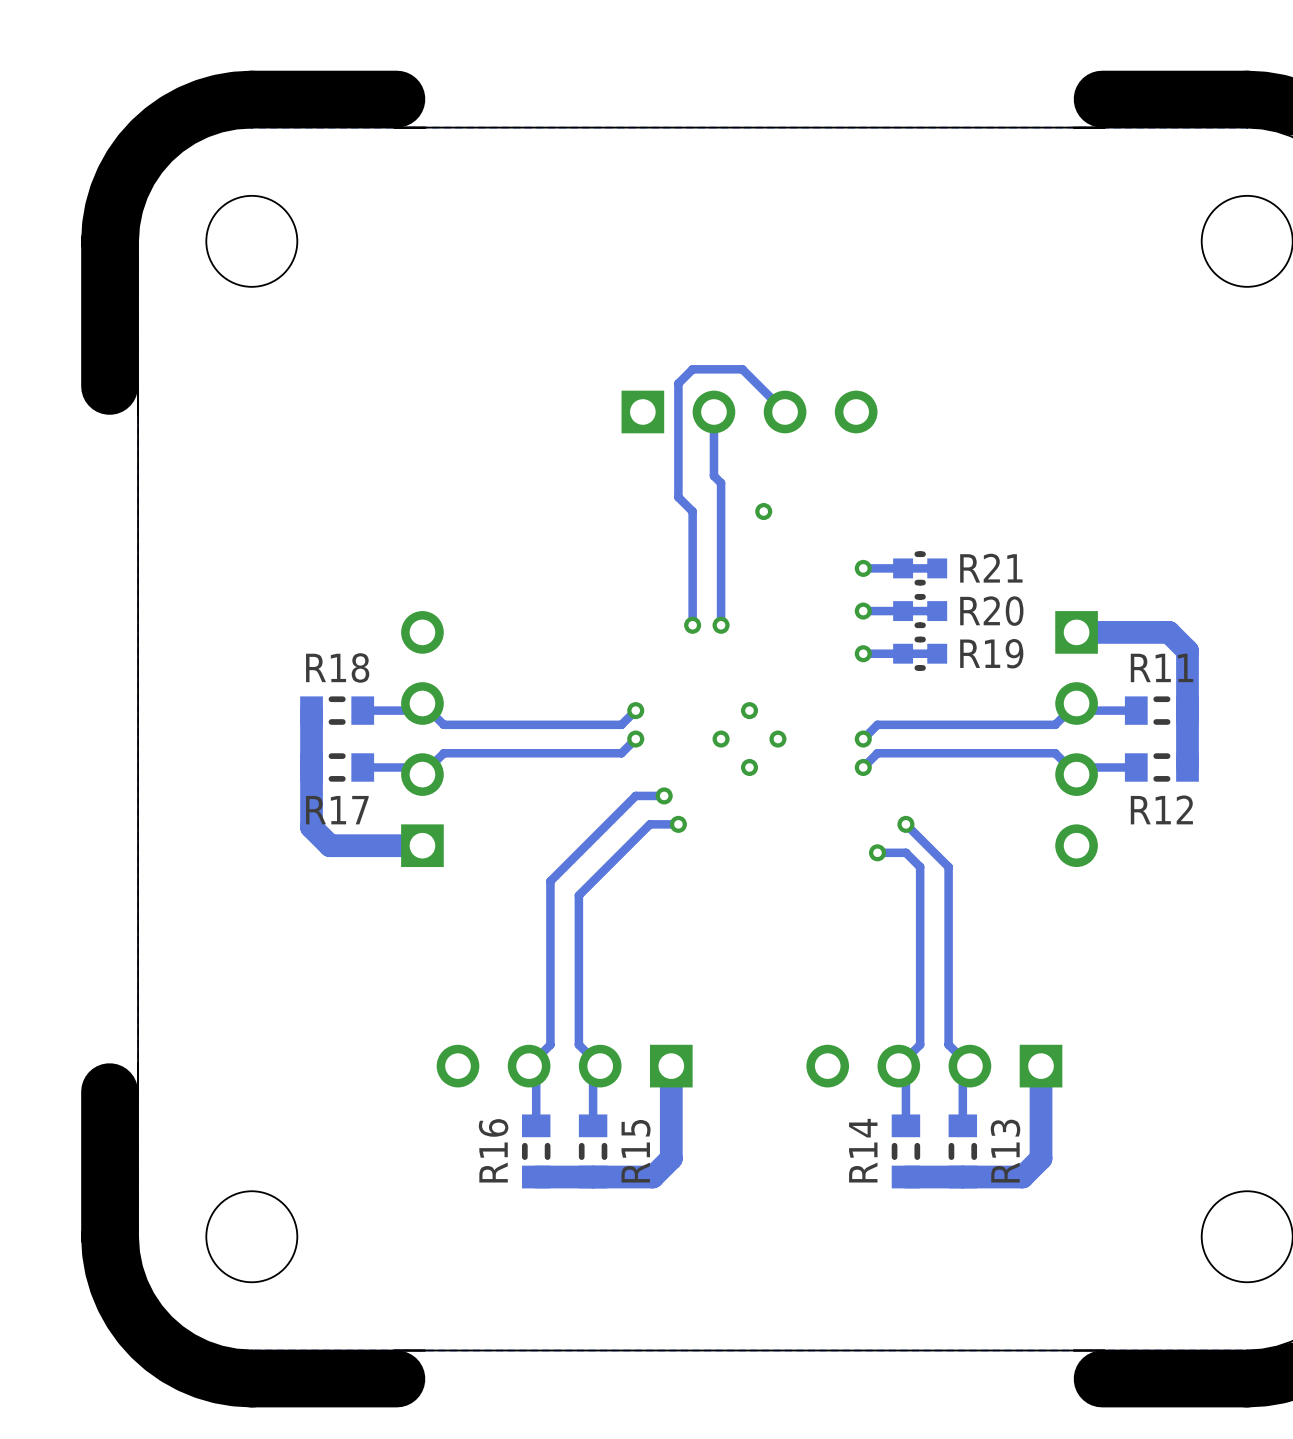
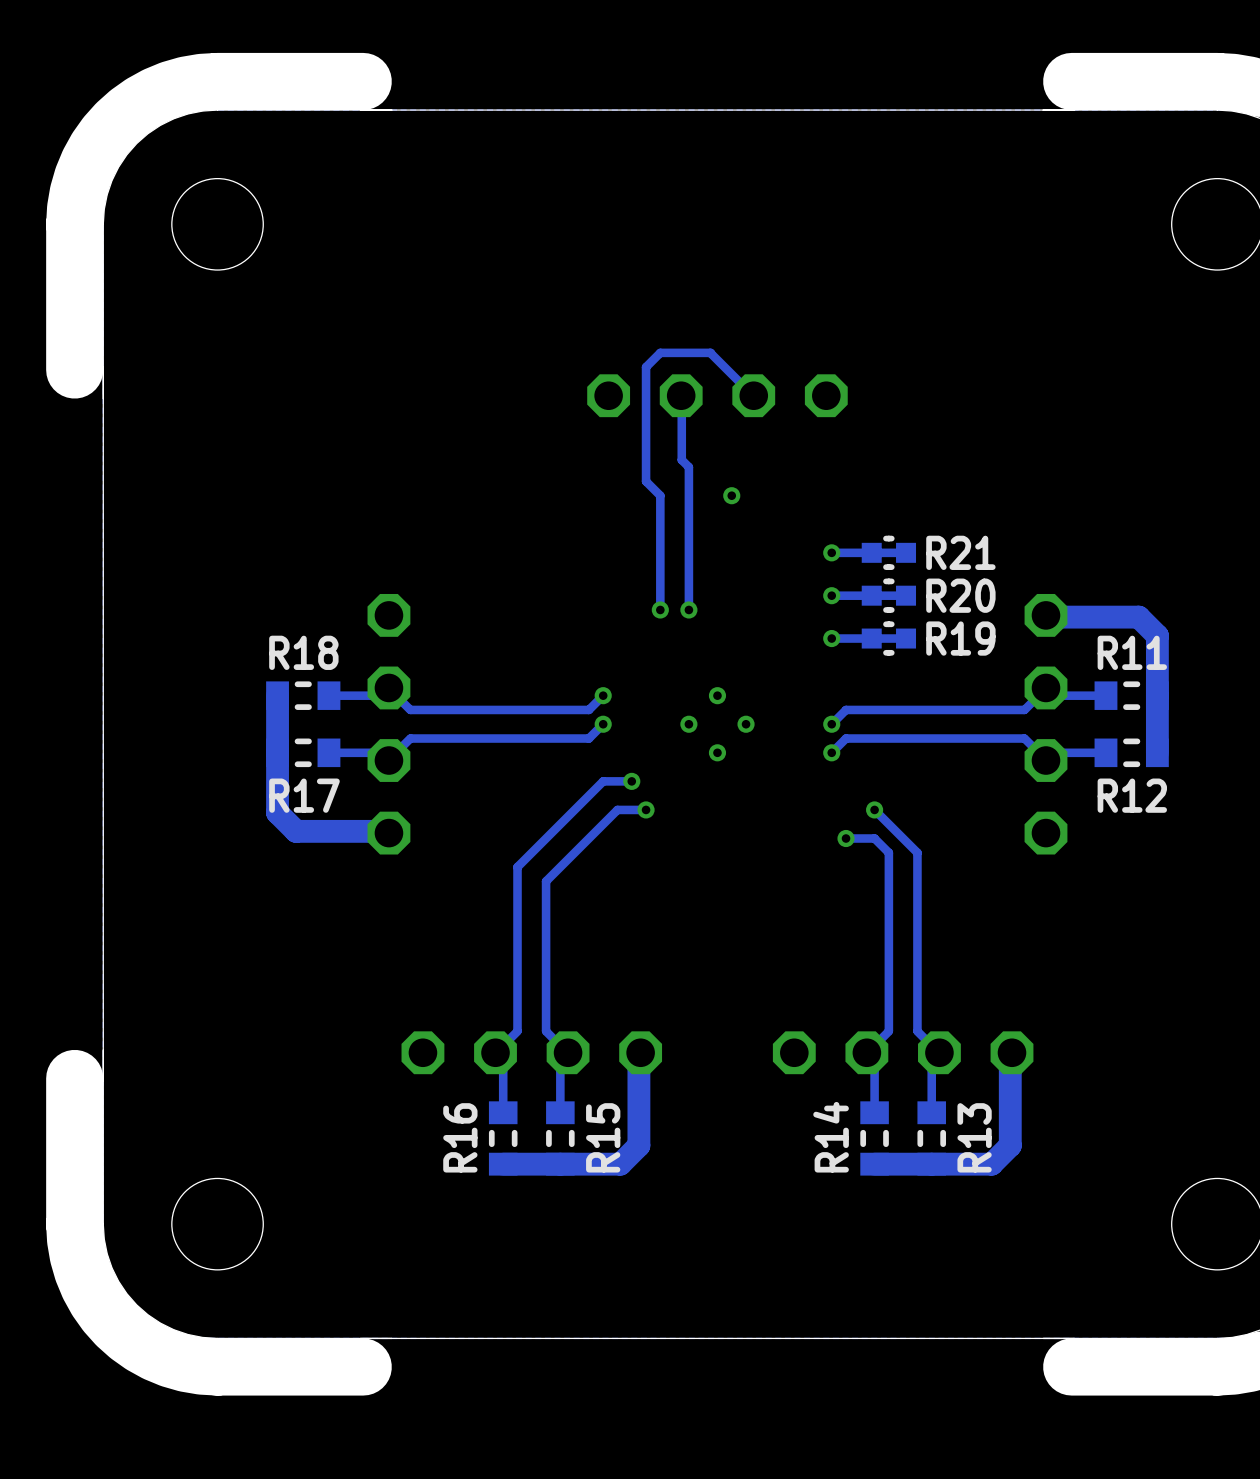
part footprint: [621, 390, 878, 434] -> [587, 374, 848, 418]
part footprint: [401, 611, 444, 868] -> [367, 593, 411, 855]
part footprint: [1055, 611, 1098, 868] -> [1024, 593, 1068, 855]
part footprint: [436, 1044, 693, 1088] -> [401, 1031, 663, 1075]
part footprint: [806, 1044, 1063, 1088] -> [772, 1031, 1034, 1075]

